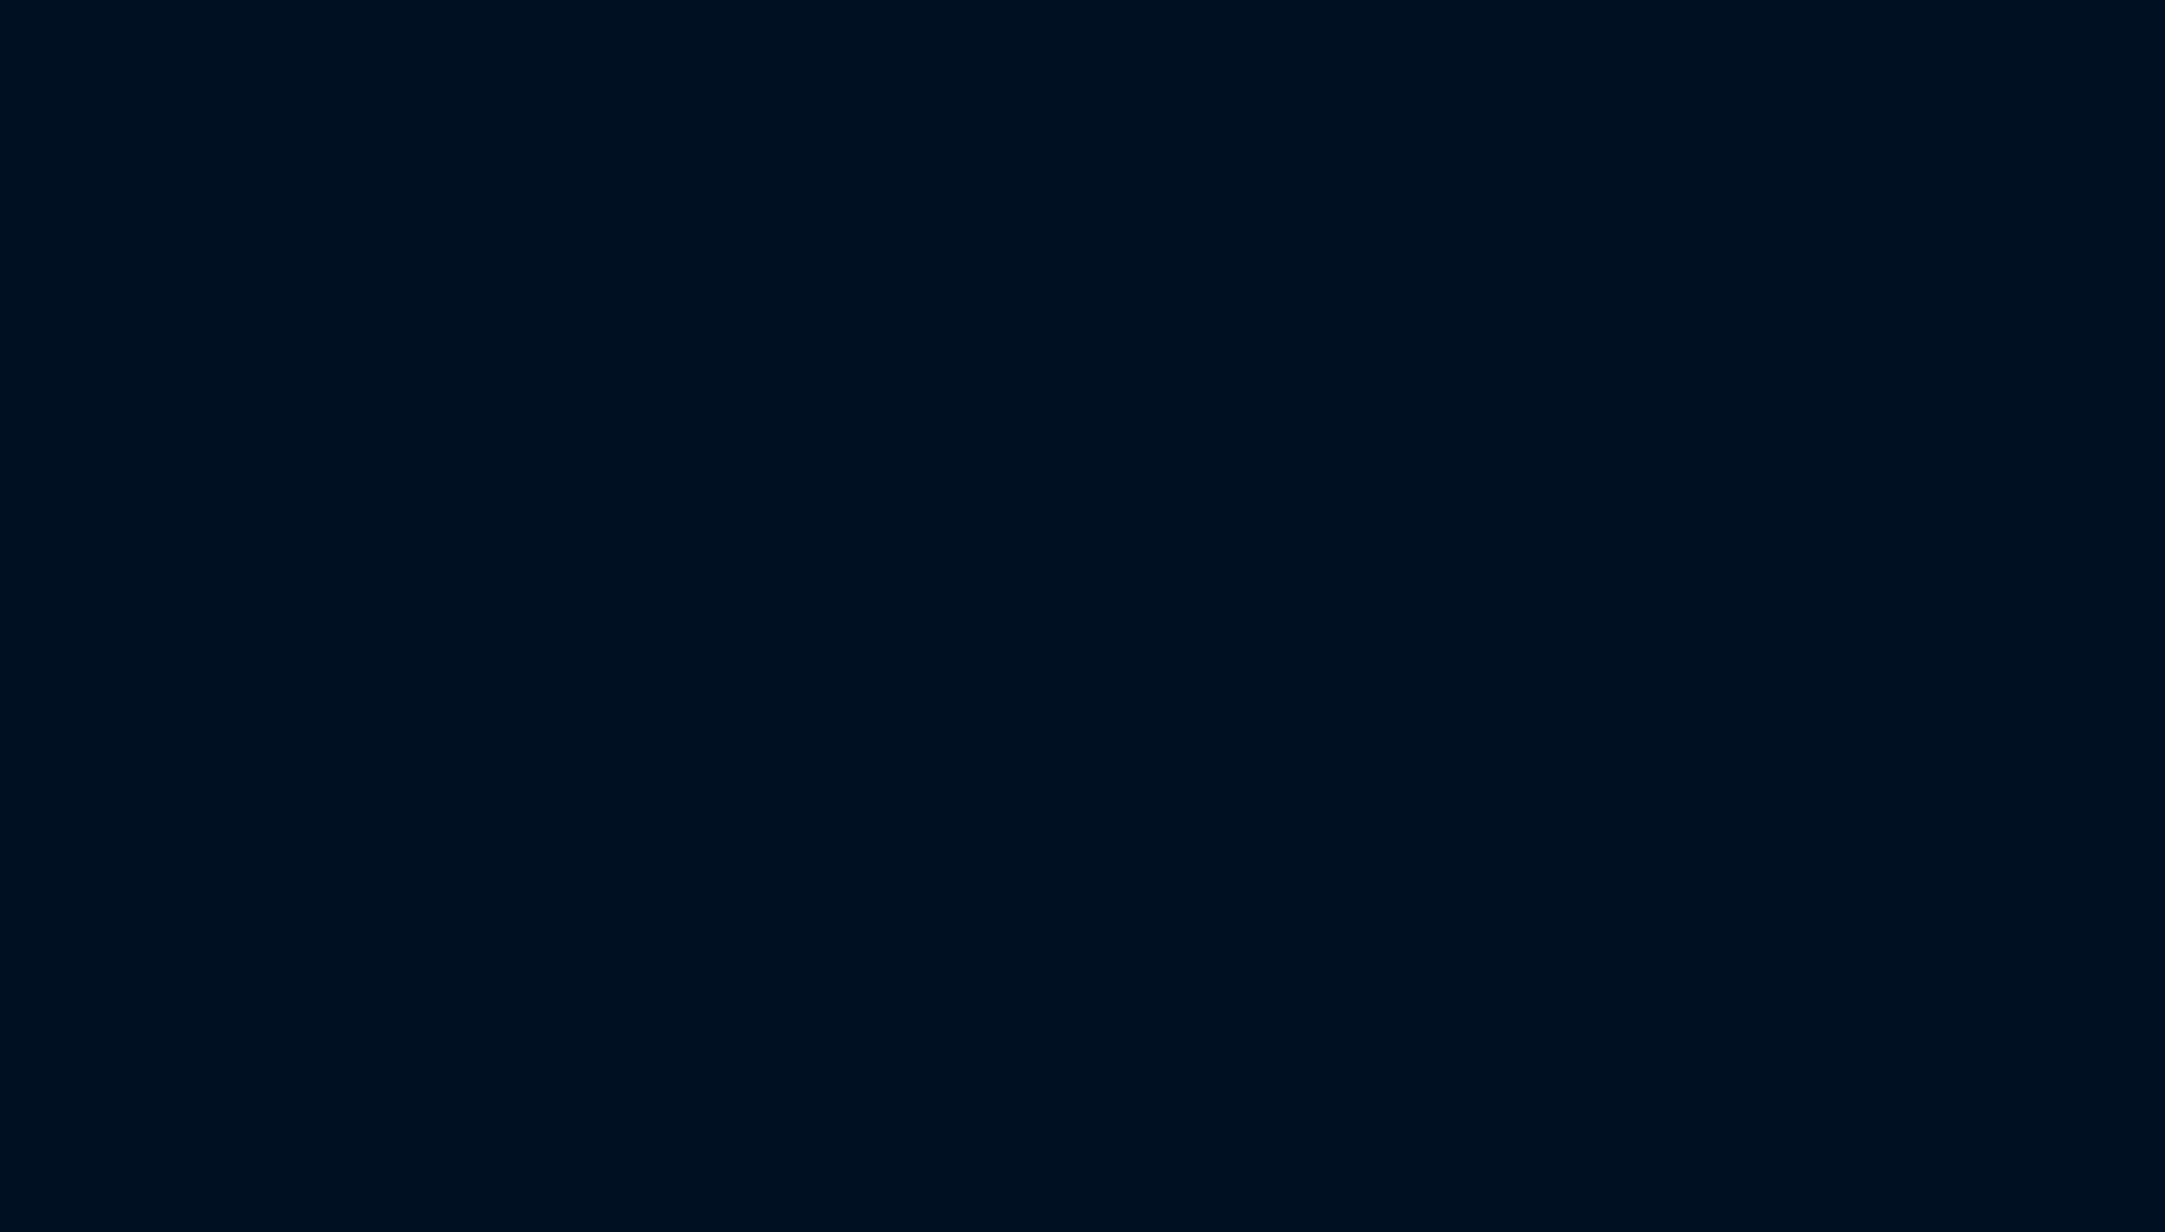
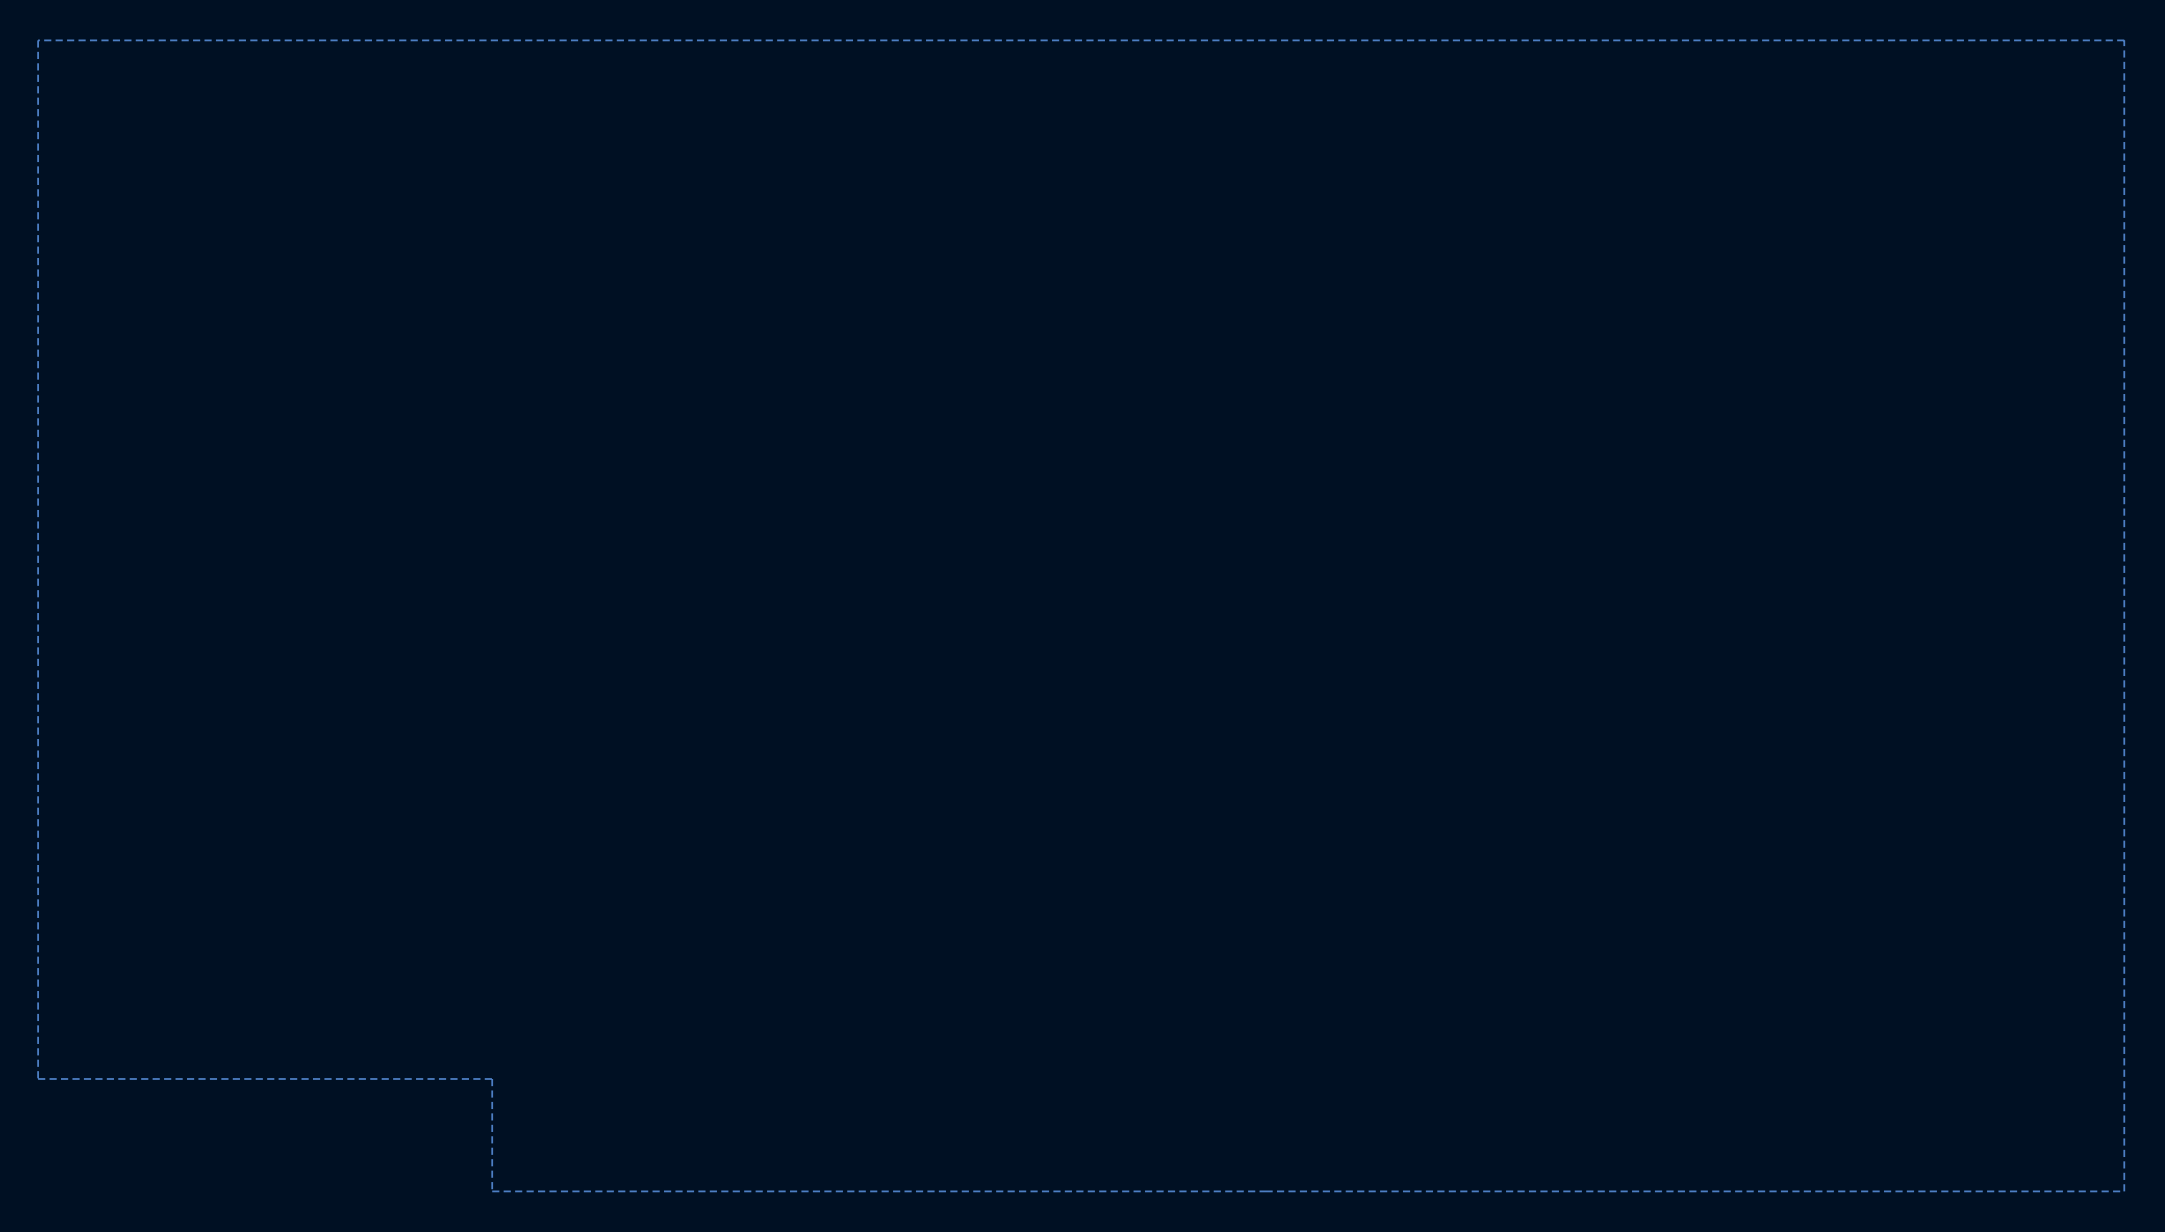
bottom zone outline: none -> (2124, 40) (2124, 1191) (492, 1191) (492, 1078) (38, 1078) (38, 40) (2124, 40)

